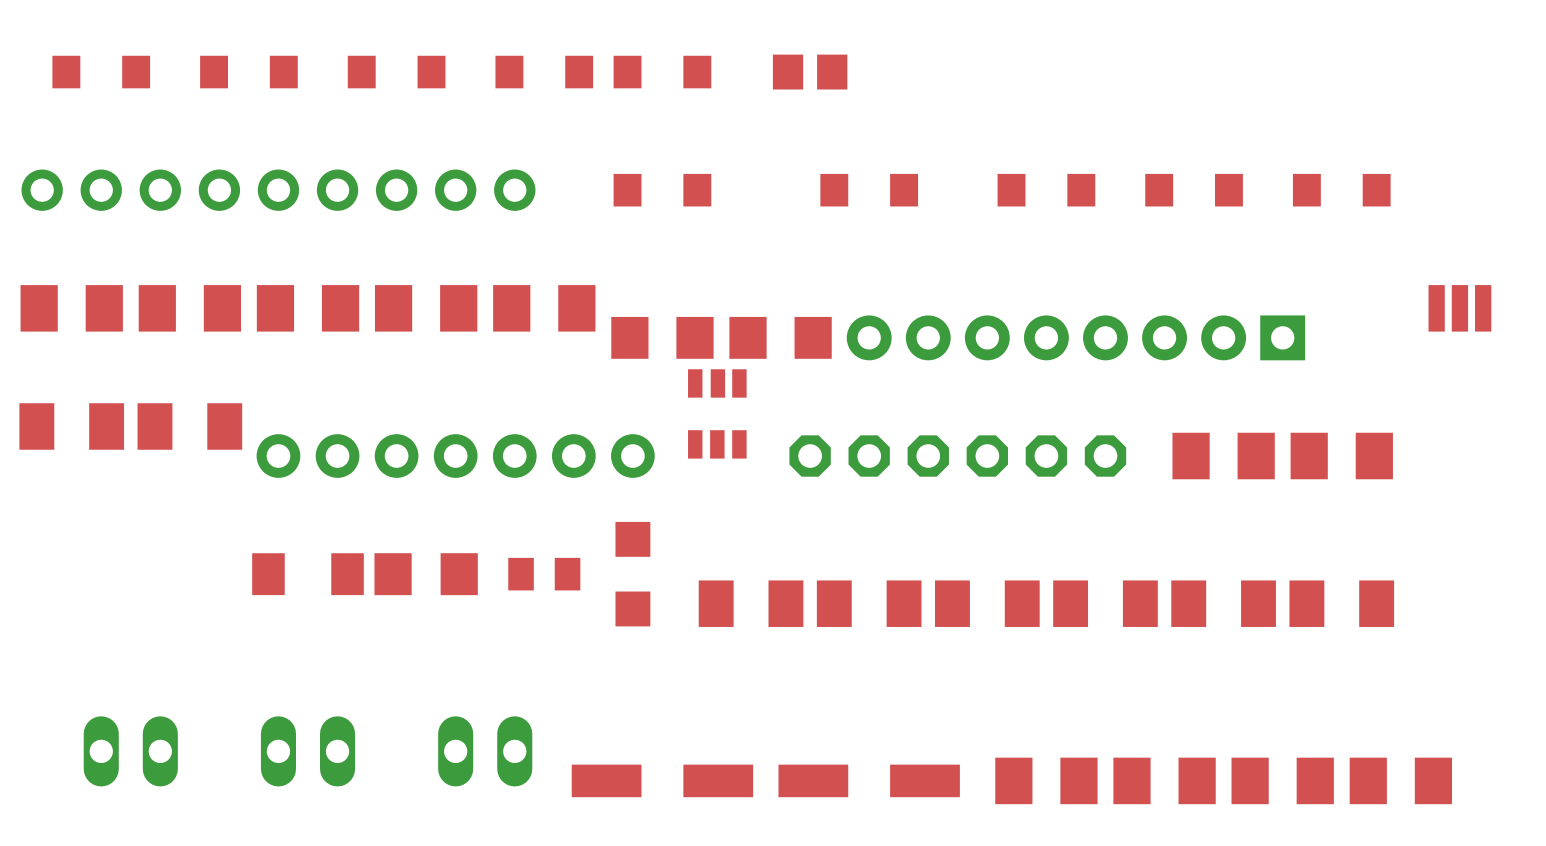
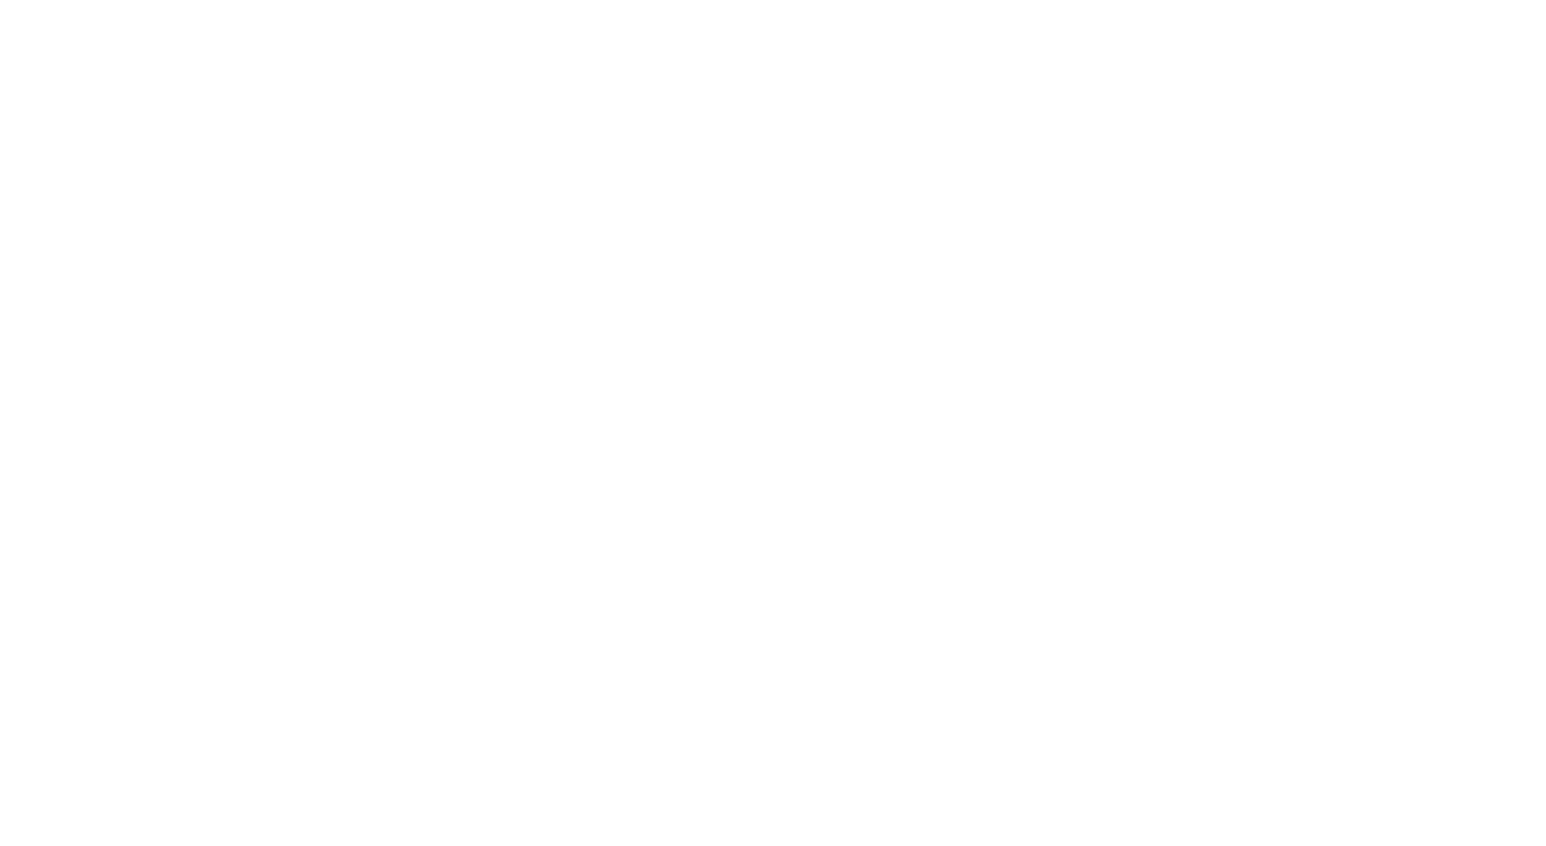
part: (101, 72) -> none
part: (248, 72) -> none
part: (396, 72) -> none
part: (544, 72) -> none
part: (662, 72) -> none
part: (810, 72) -> none
part: (278, 190) -> none
part: (662, 190) -> none
part: (869, 190) -> none
part: (1046, 190) -> none
part: (1194, 190) -> none
part: (1341, 190) -> none
part: (71, 308) -> none
part: (189, 308) -> none
part: (308, 308) -> none
part: (426, 308) -> none
part: (544, 308) -> none
part: (1459, 308) -> none
part: (662, 337) -> none
part: (780, 337) -> none
part: (1075, 337) -> none
part: (717, 413) -> none
part: (71, 426) -> none
part: (189, 426) -> none
part: (455, 456) -> none
part: (957, 456) -> none
part: (1223, 456) -> none
part: (1341, 456) -> none
part: (308, 574) -> none
part: (426, 574) -> none
part: (544, 574) -> none
part: (632, 574) -> none
part: (751, 603) -> none
part: (869, 603) -> none
part: (987, 603) -> none
part: (1105, 603) -> none
part: (1223, 603) -> none
part: (1341, 603) -> none
part: (130, 751) -> none
part: (308, 751) -> none
part: (485, 751) -> none
part: (662, 780) -> none
part: (869, 780) -> none
part: (1046, 780) -> none
part: (1164, 780) -> none
part: (1282, 780) -> none
part: (1400, 780) -> none

